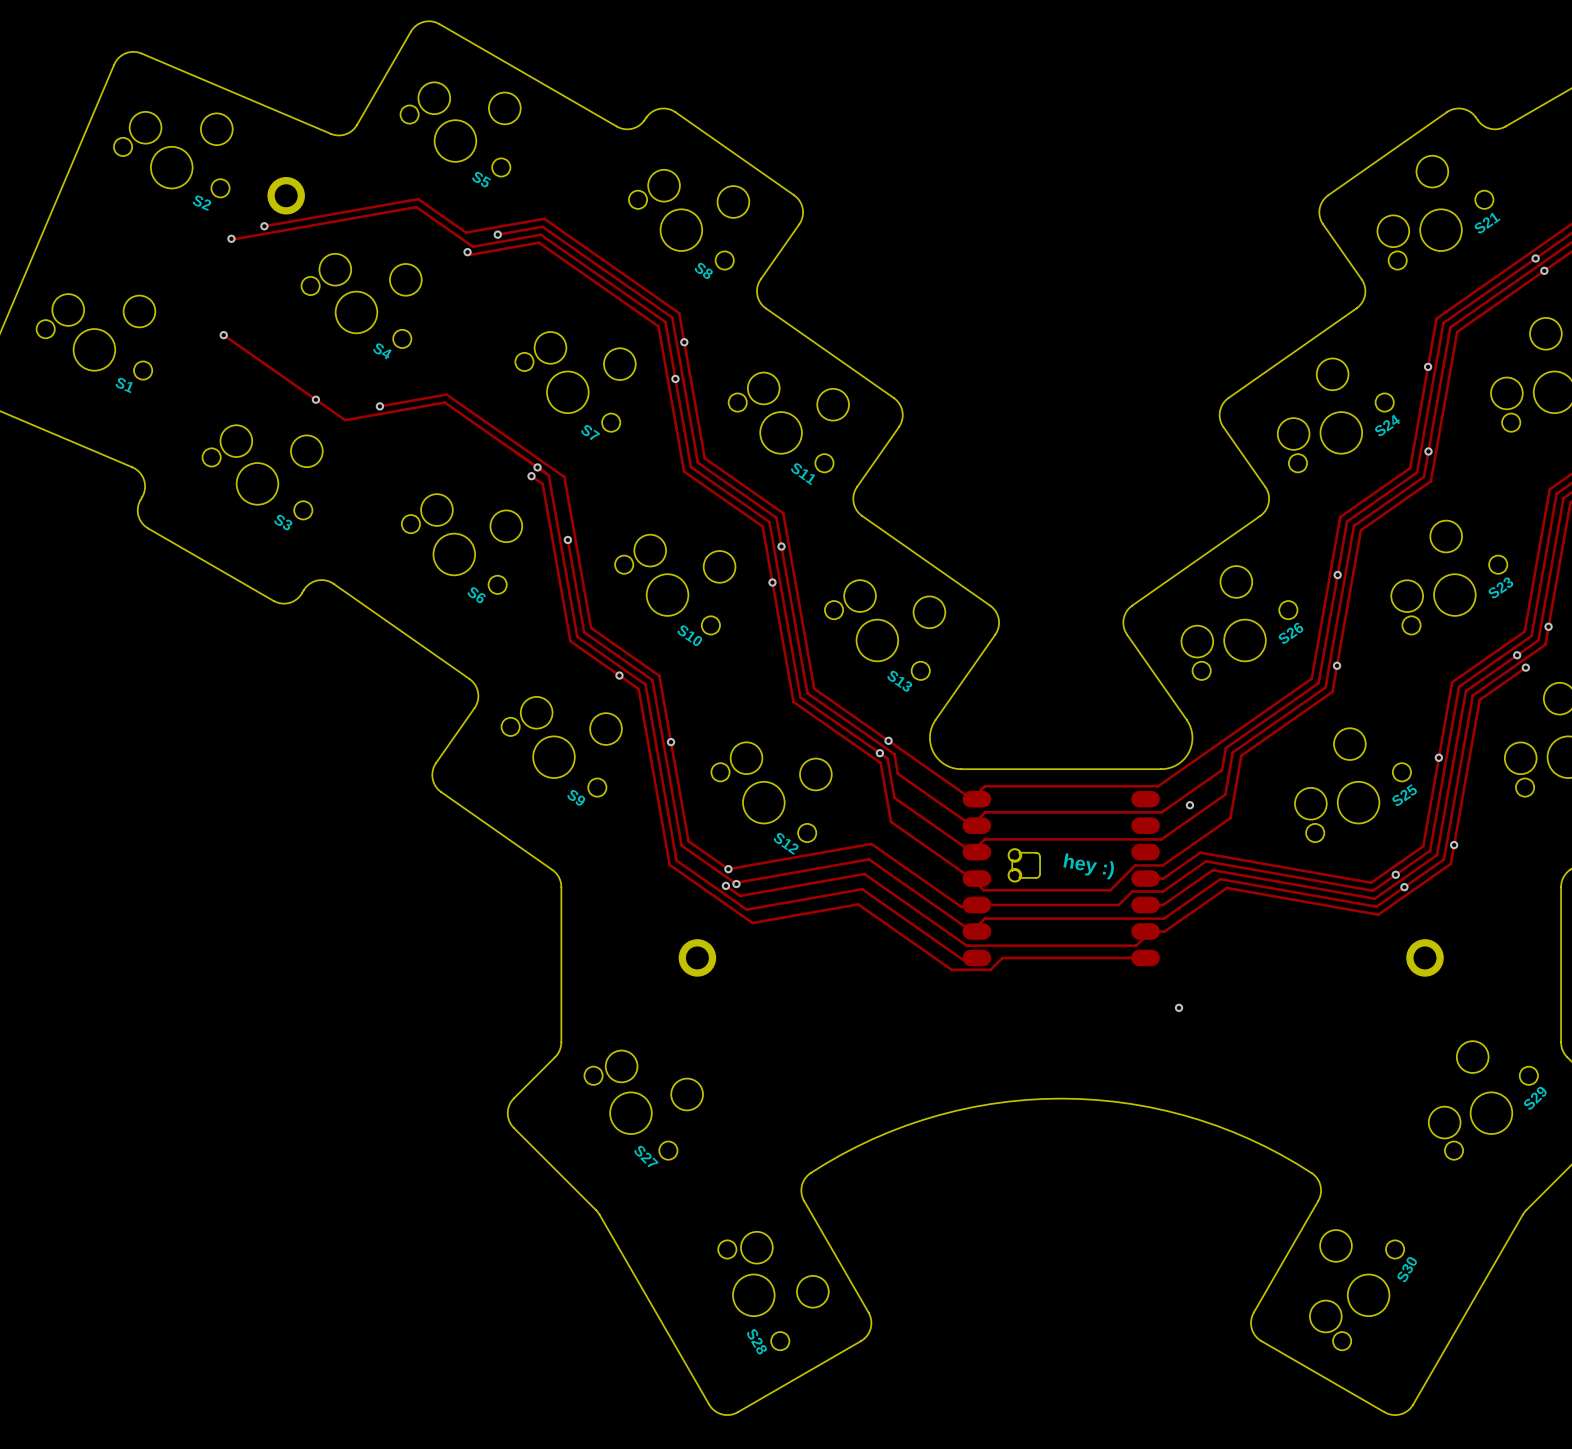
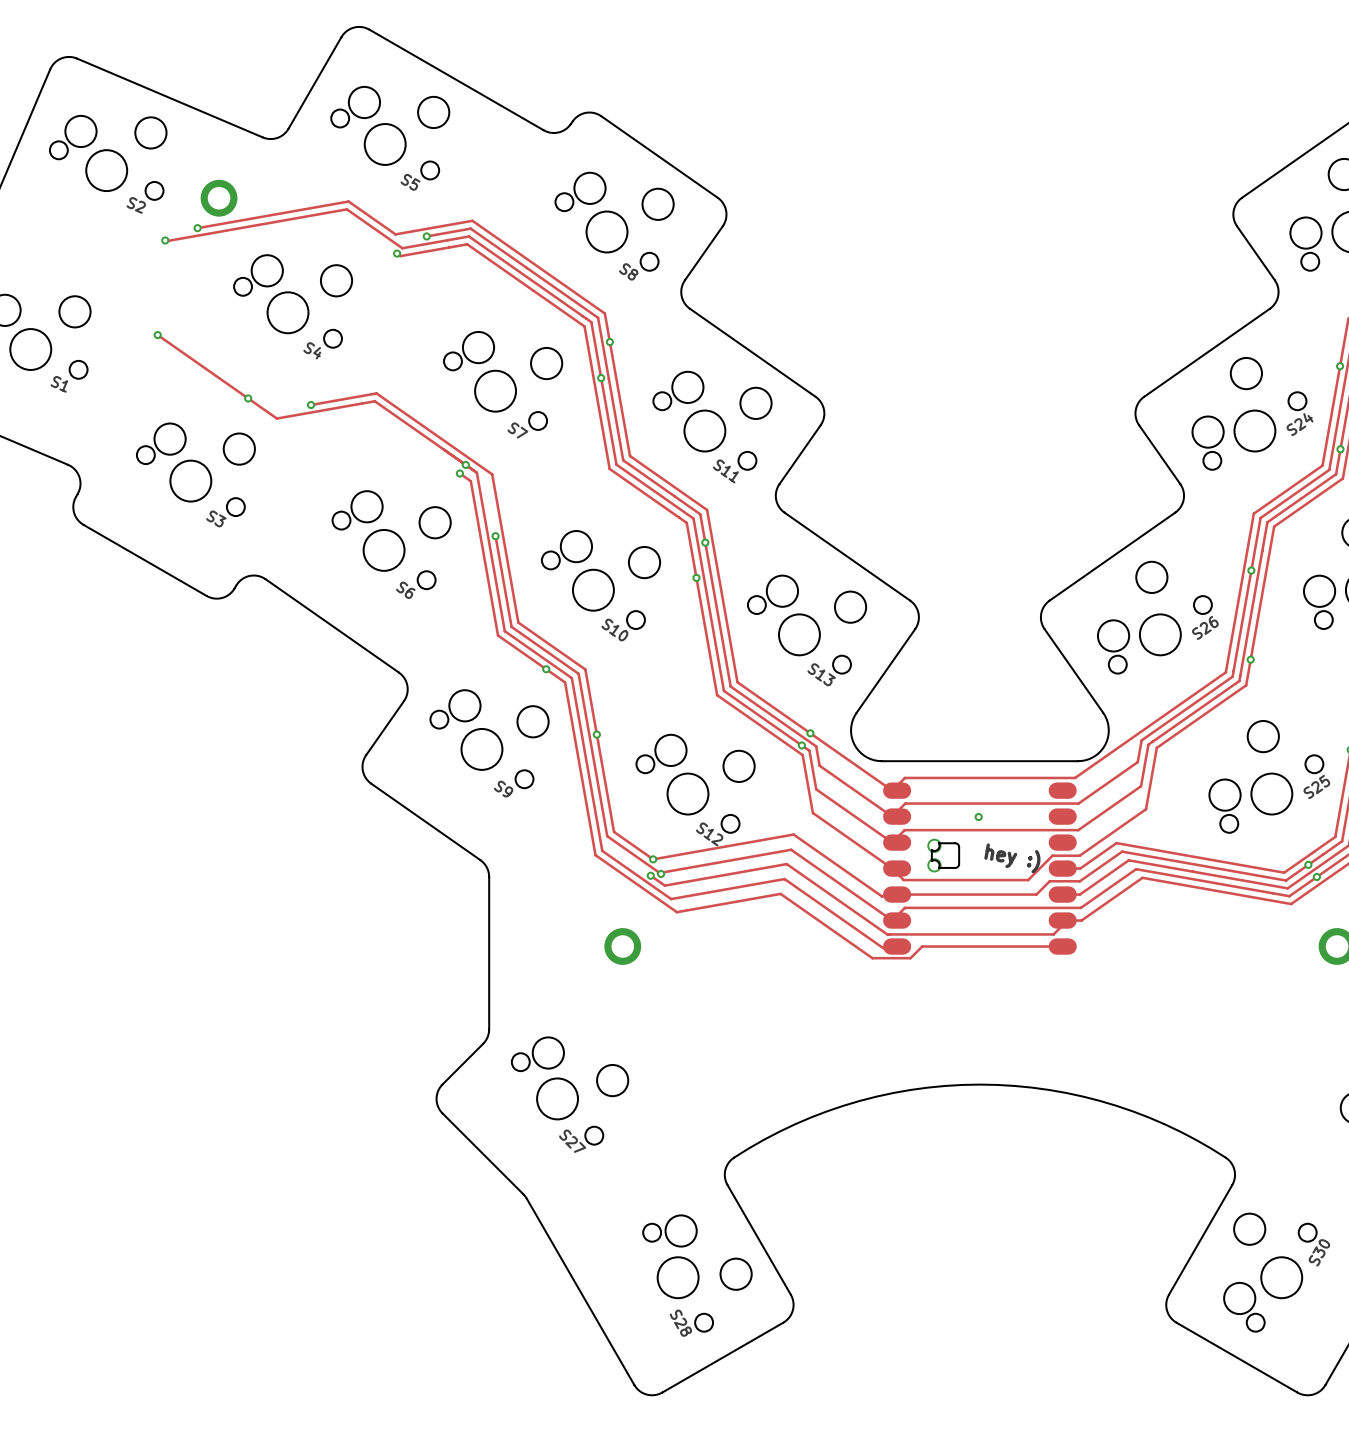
via: (1189, 805) -> none
via: none -> (978, 817)
via: (1179, 1007) -> none

